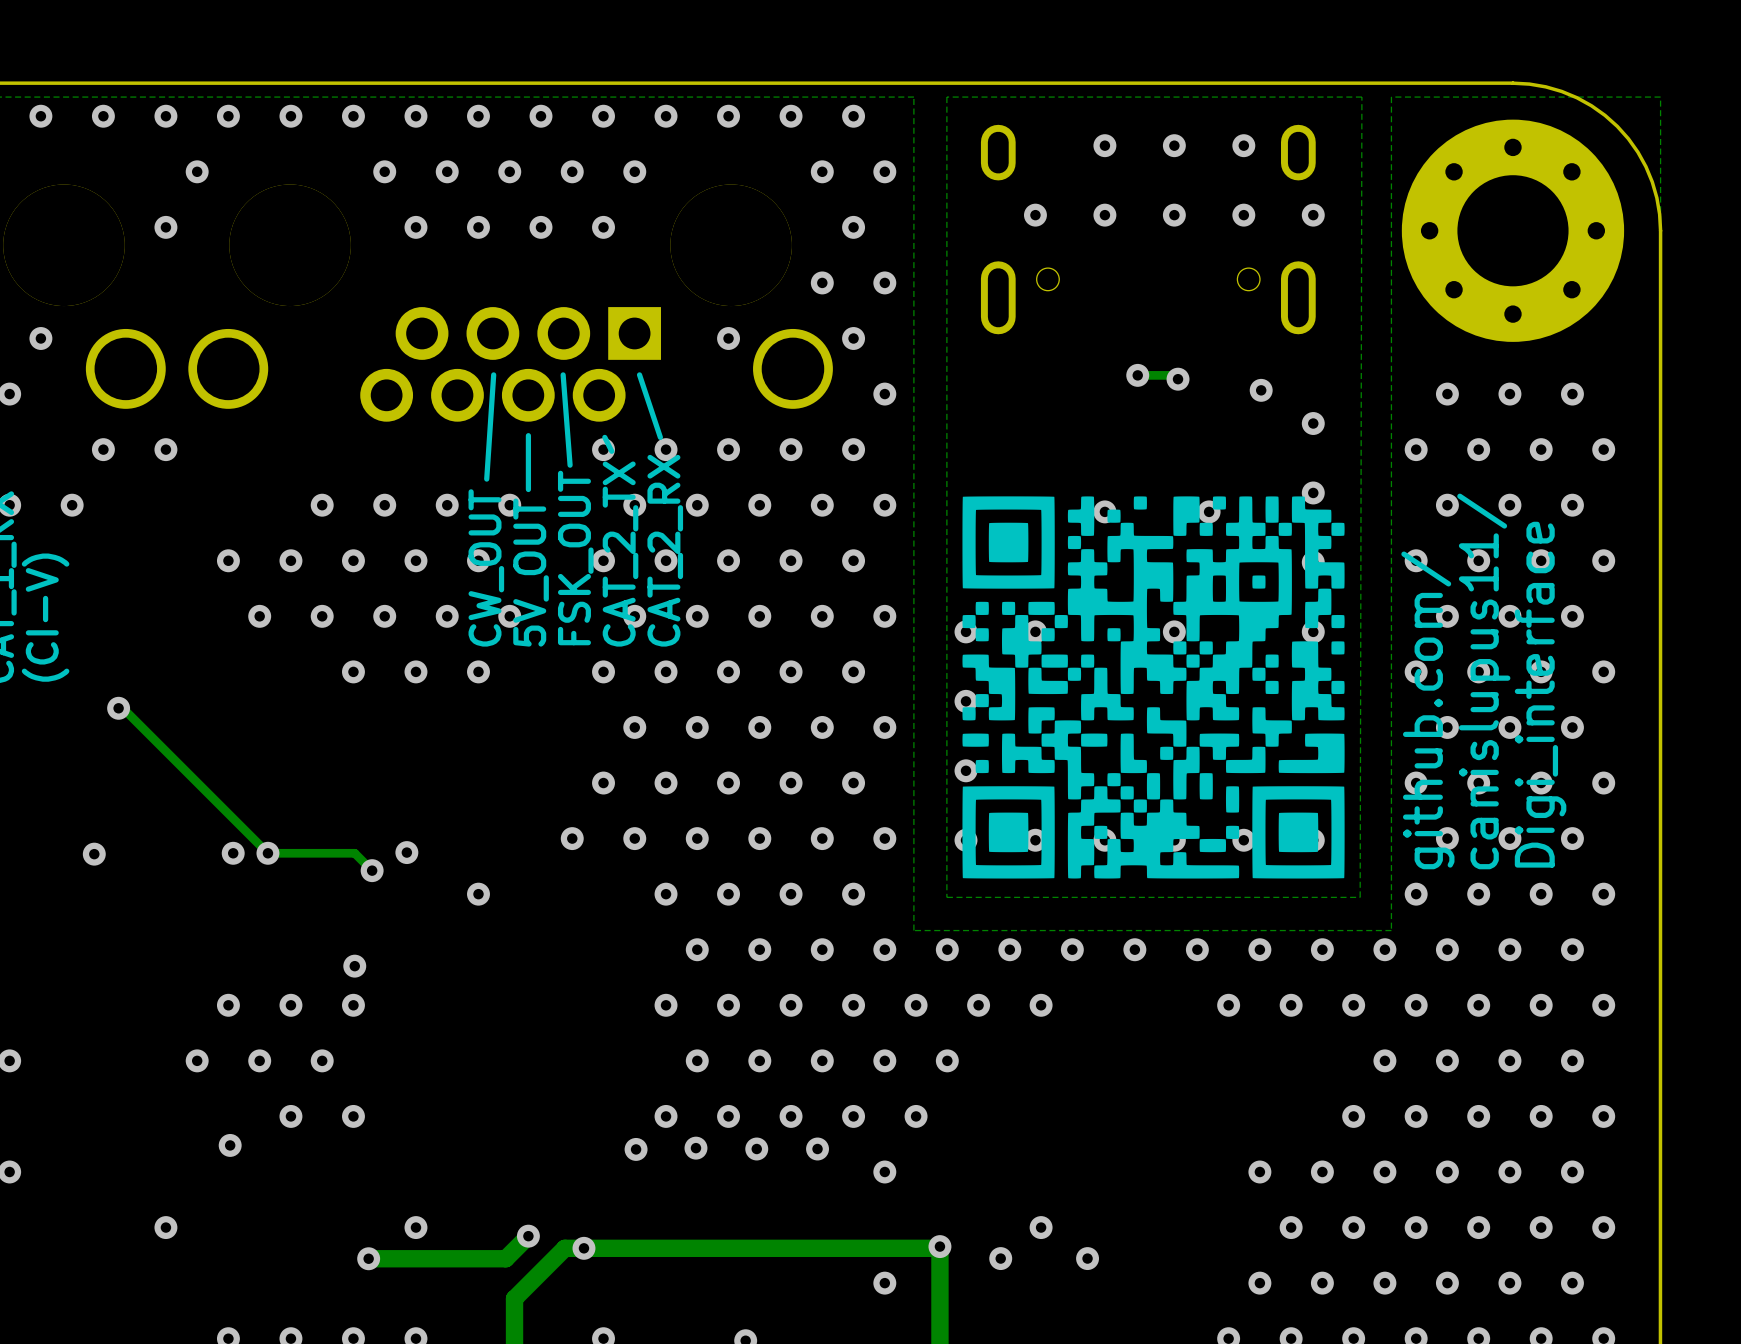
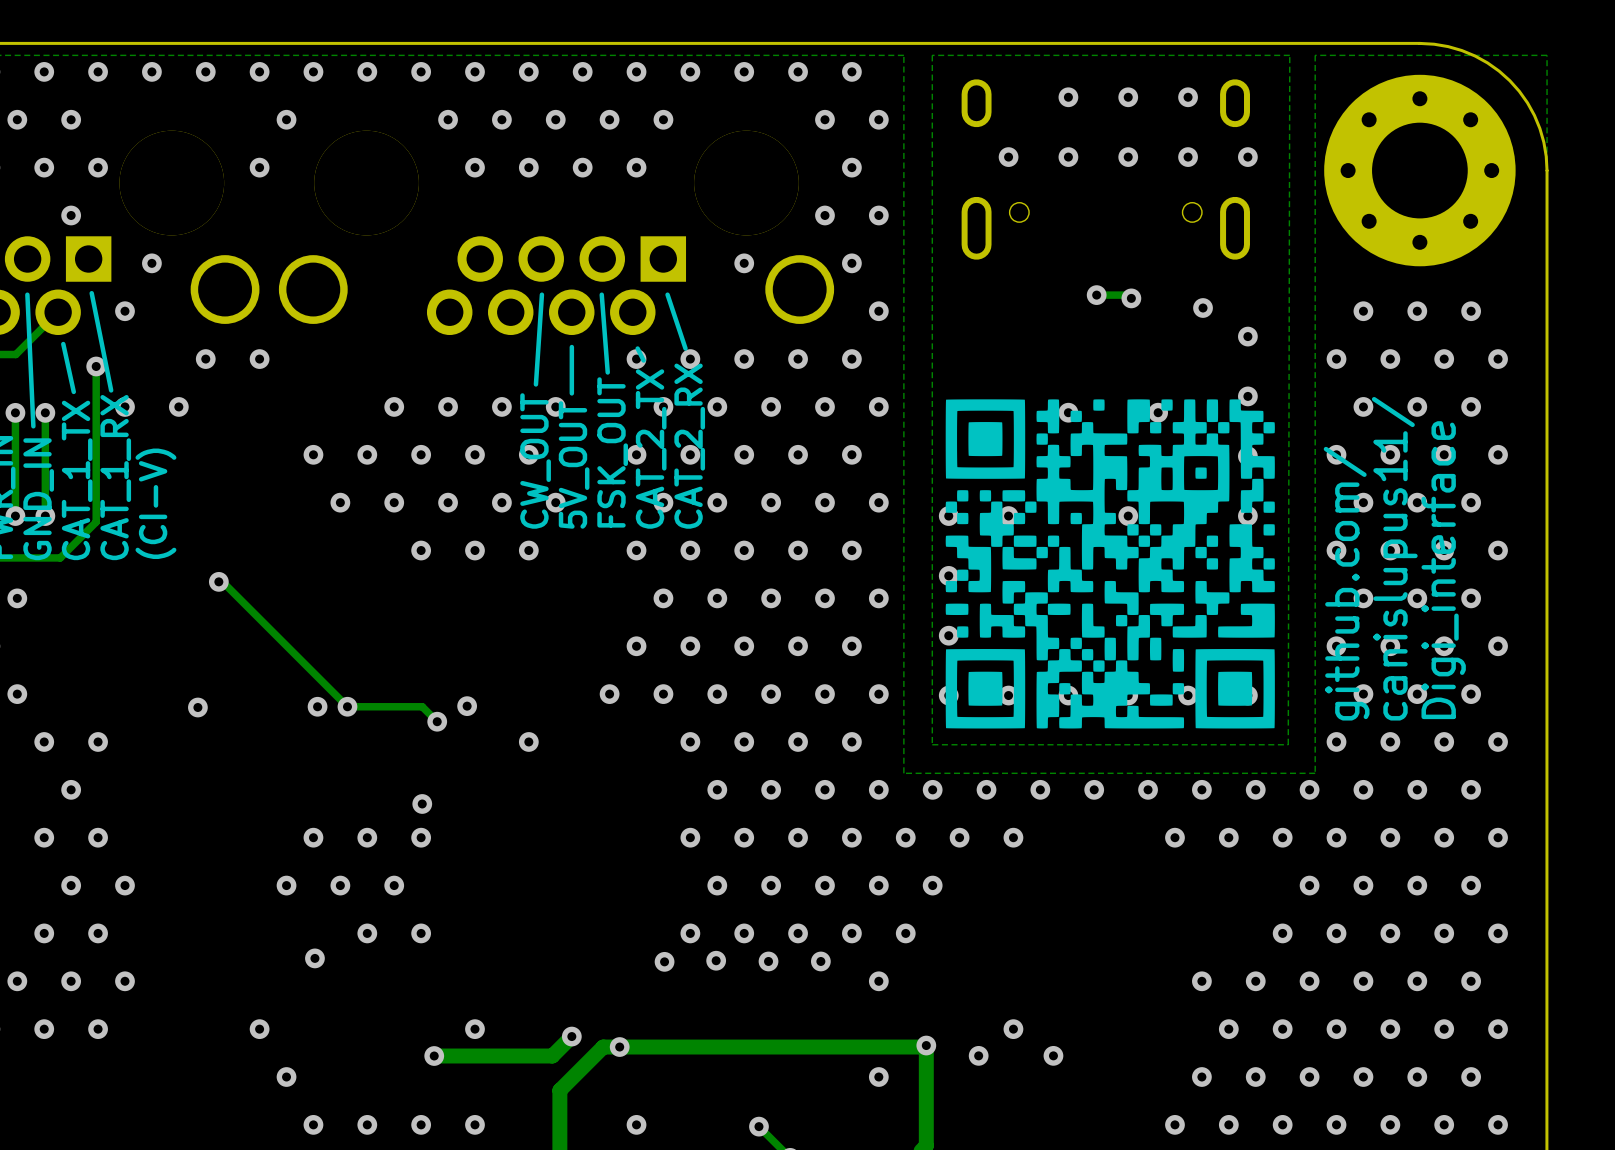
via: none -> (286, 1077)

